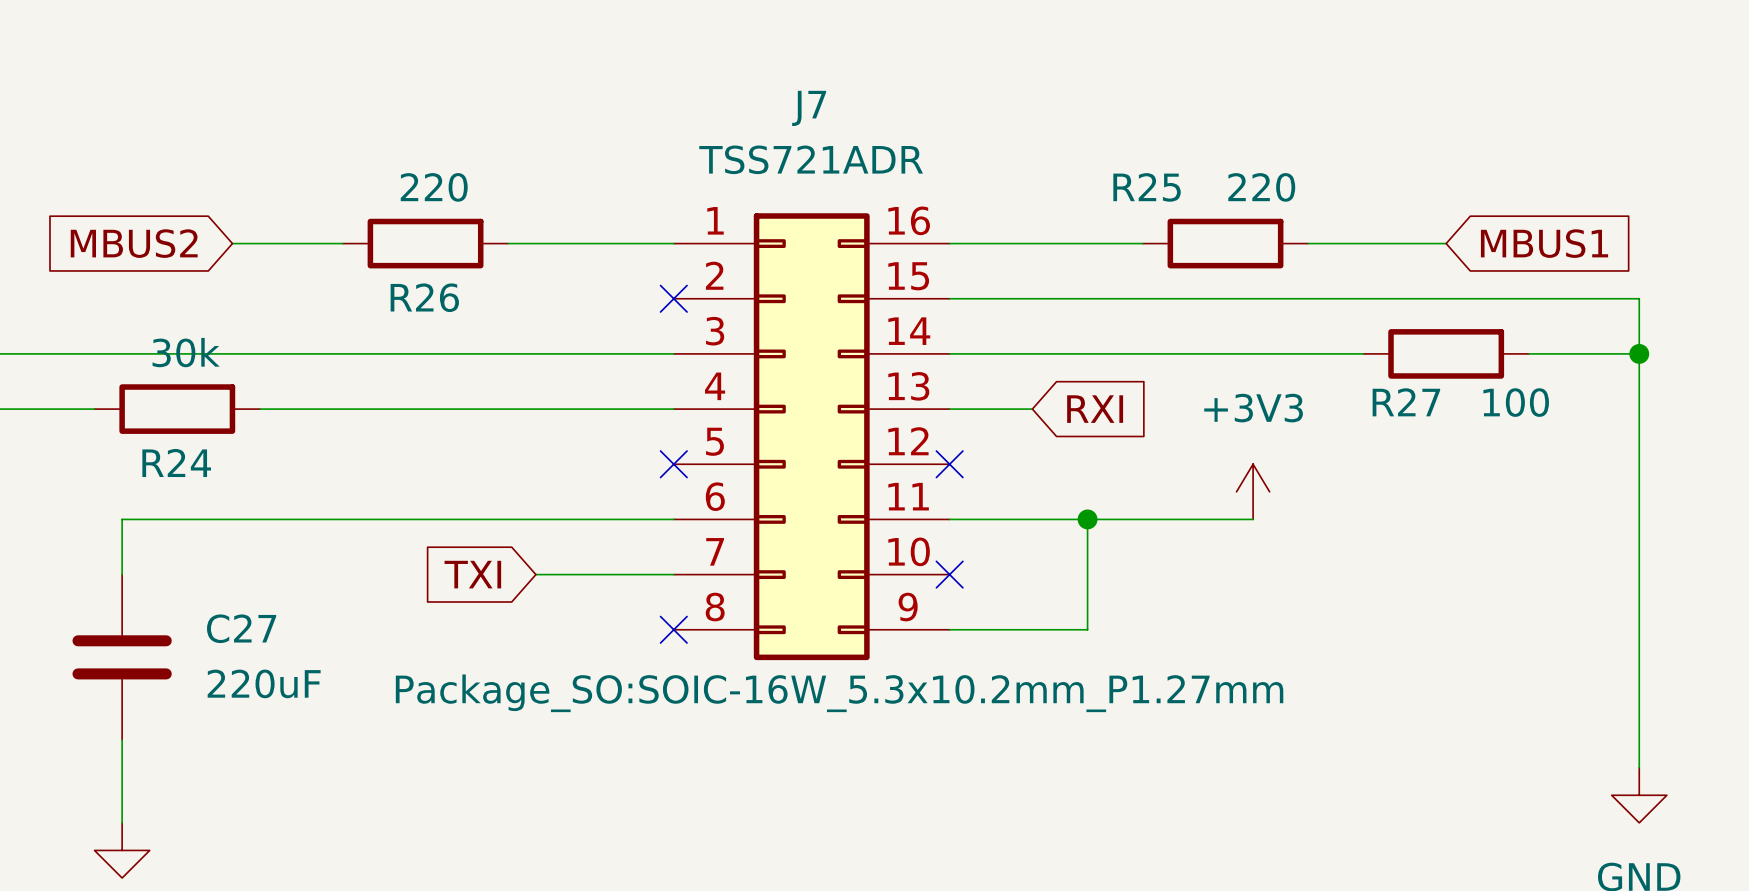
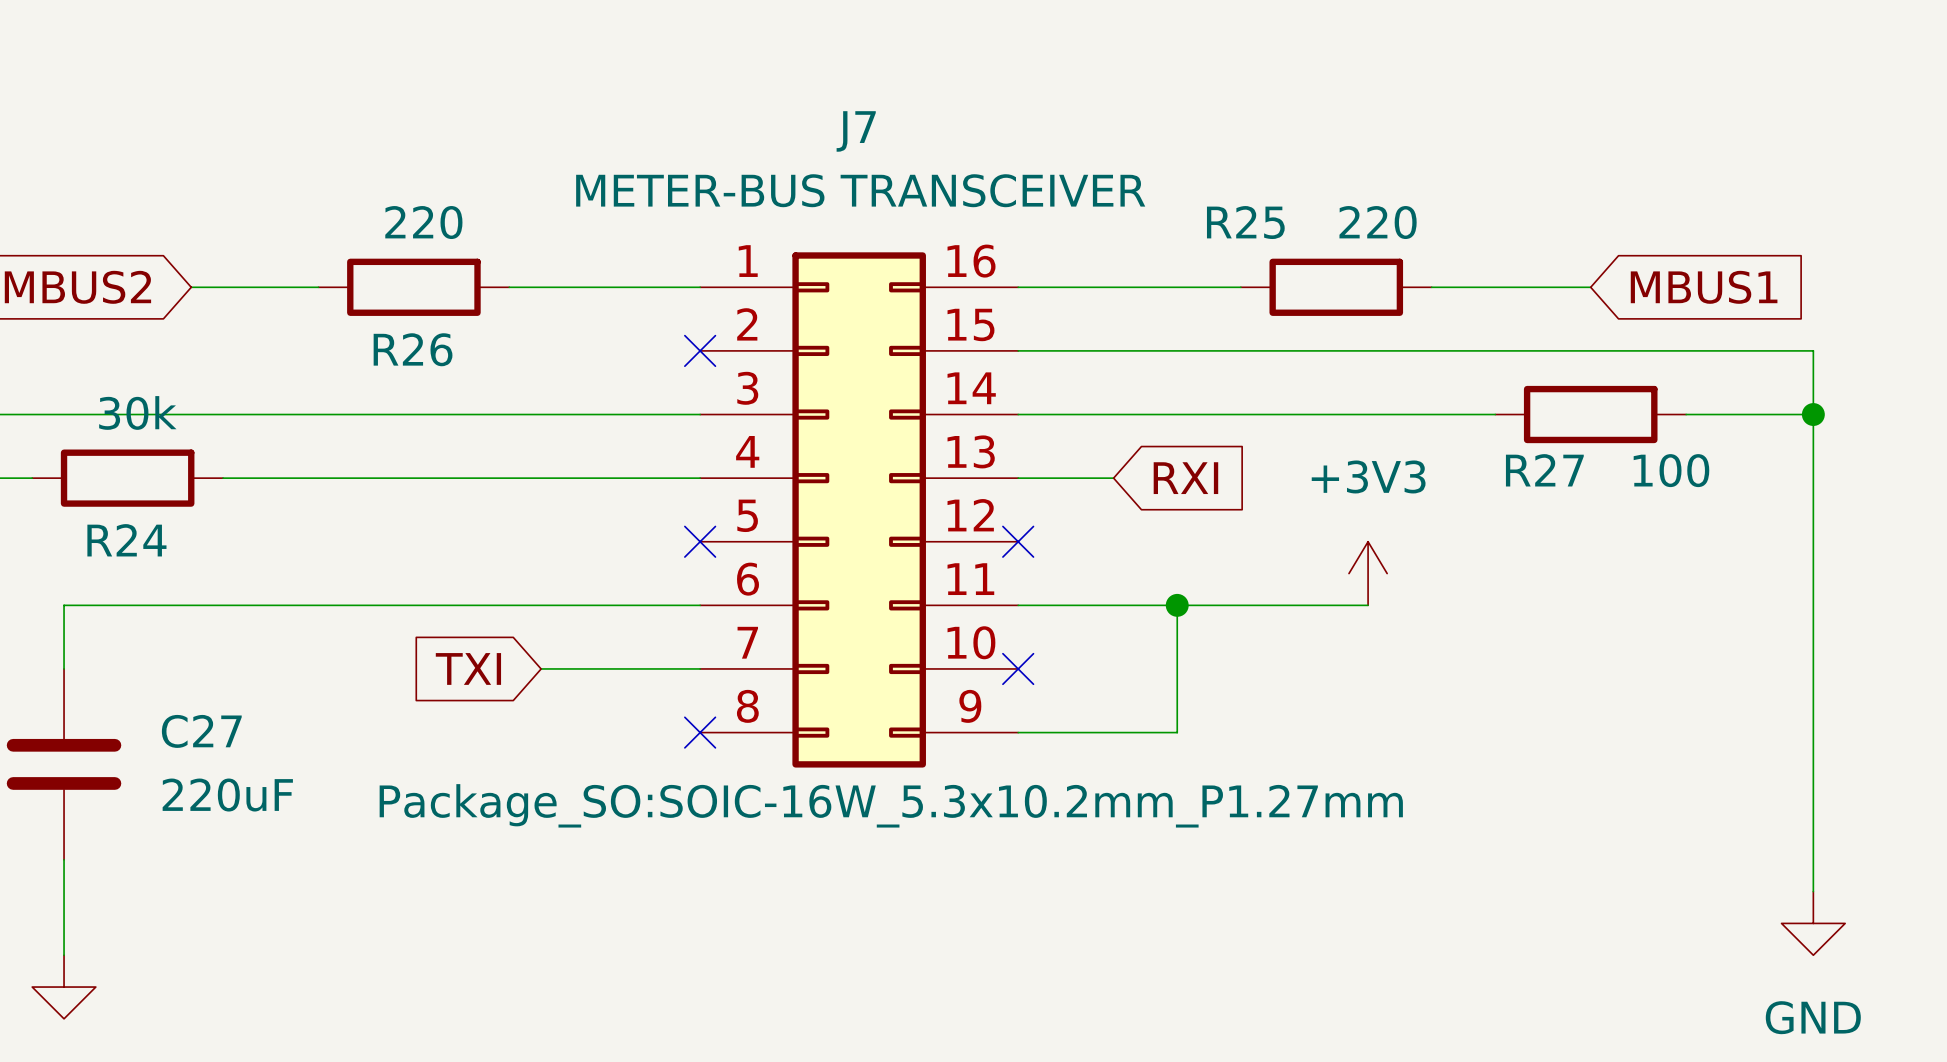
J7 value: TSS721ADR (811, 159) -> METER-BUS TRANSCEIVER (860, 190)

